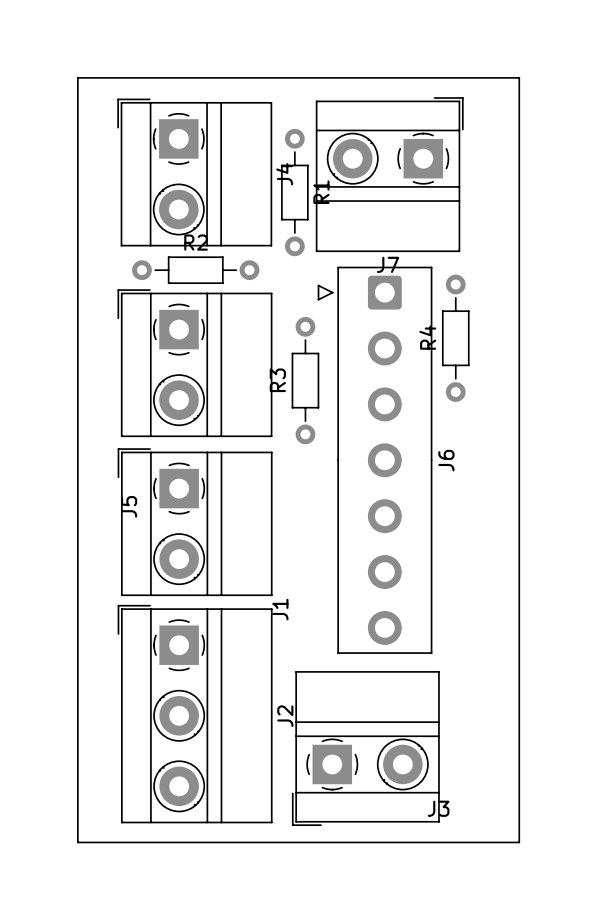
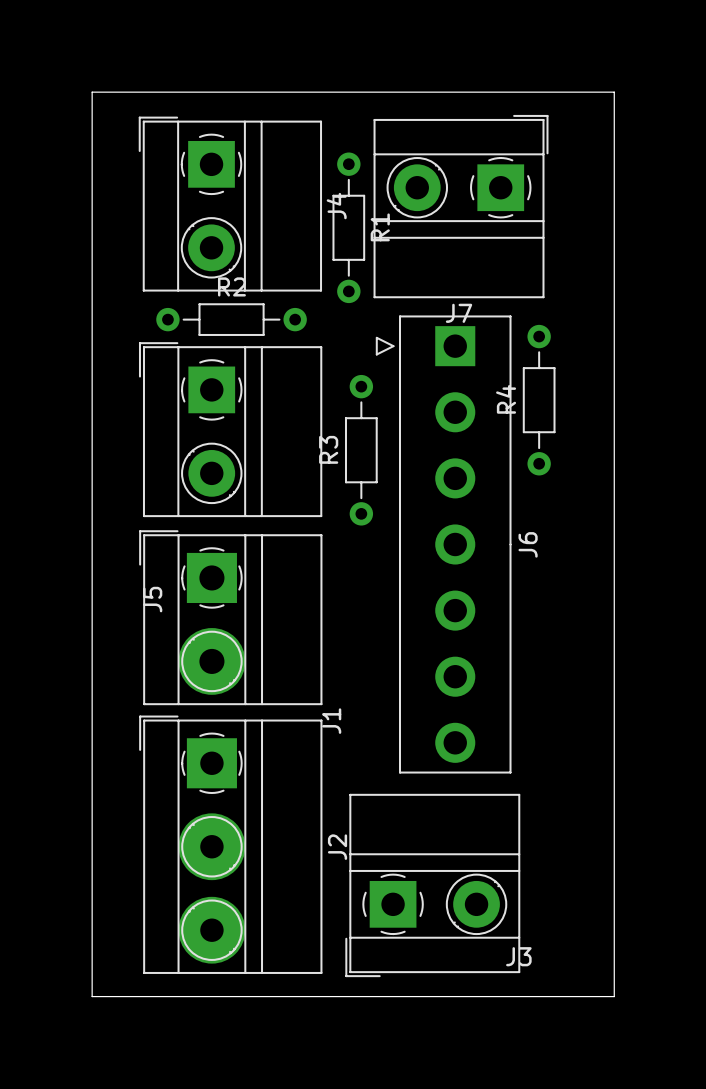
J6 footprint: [317, 266, 433, 654] -> [375, 315, 512, 774]
J1 footprint: [117, 448, 273, 597] -> [139, 530, 323, 706]
J2 footprint: [117, 604, 273, 824] -> [139, 715, 323, 974]

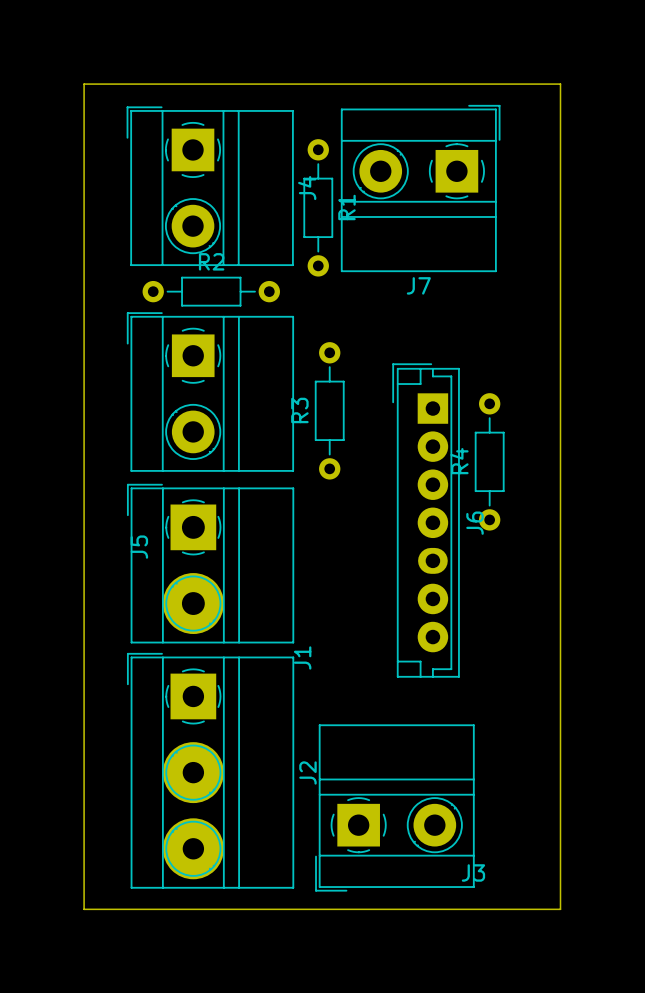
J6 footprint: [375, 315, 512, 774] -> [392, 363, 460, 678]
R4 position: (539, 400) -> (489, 461)

